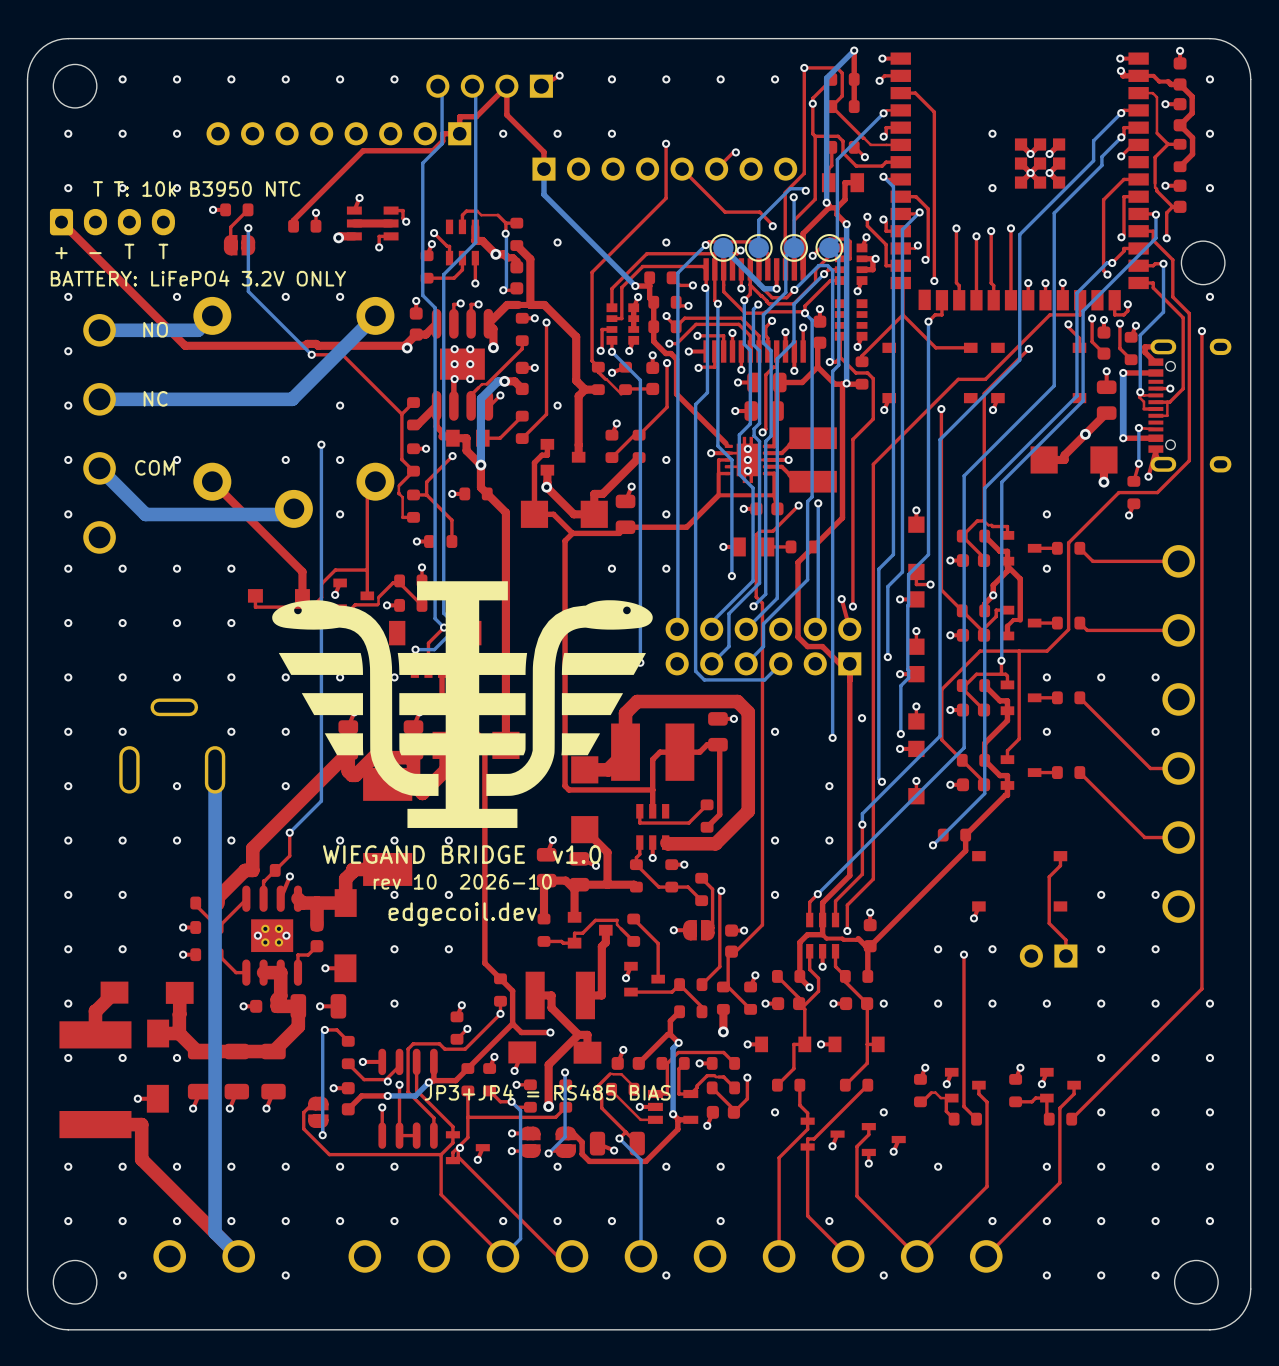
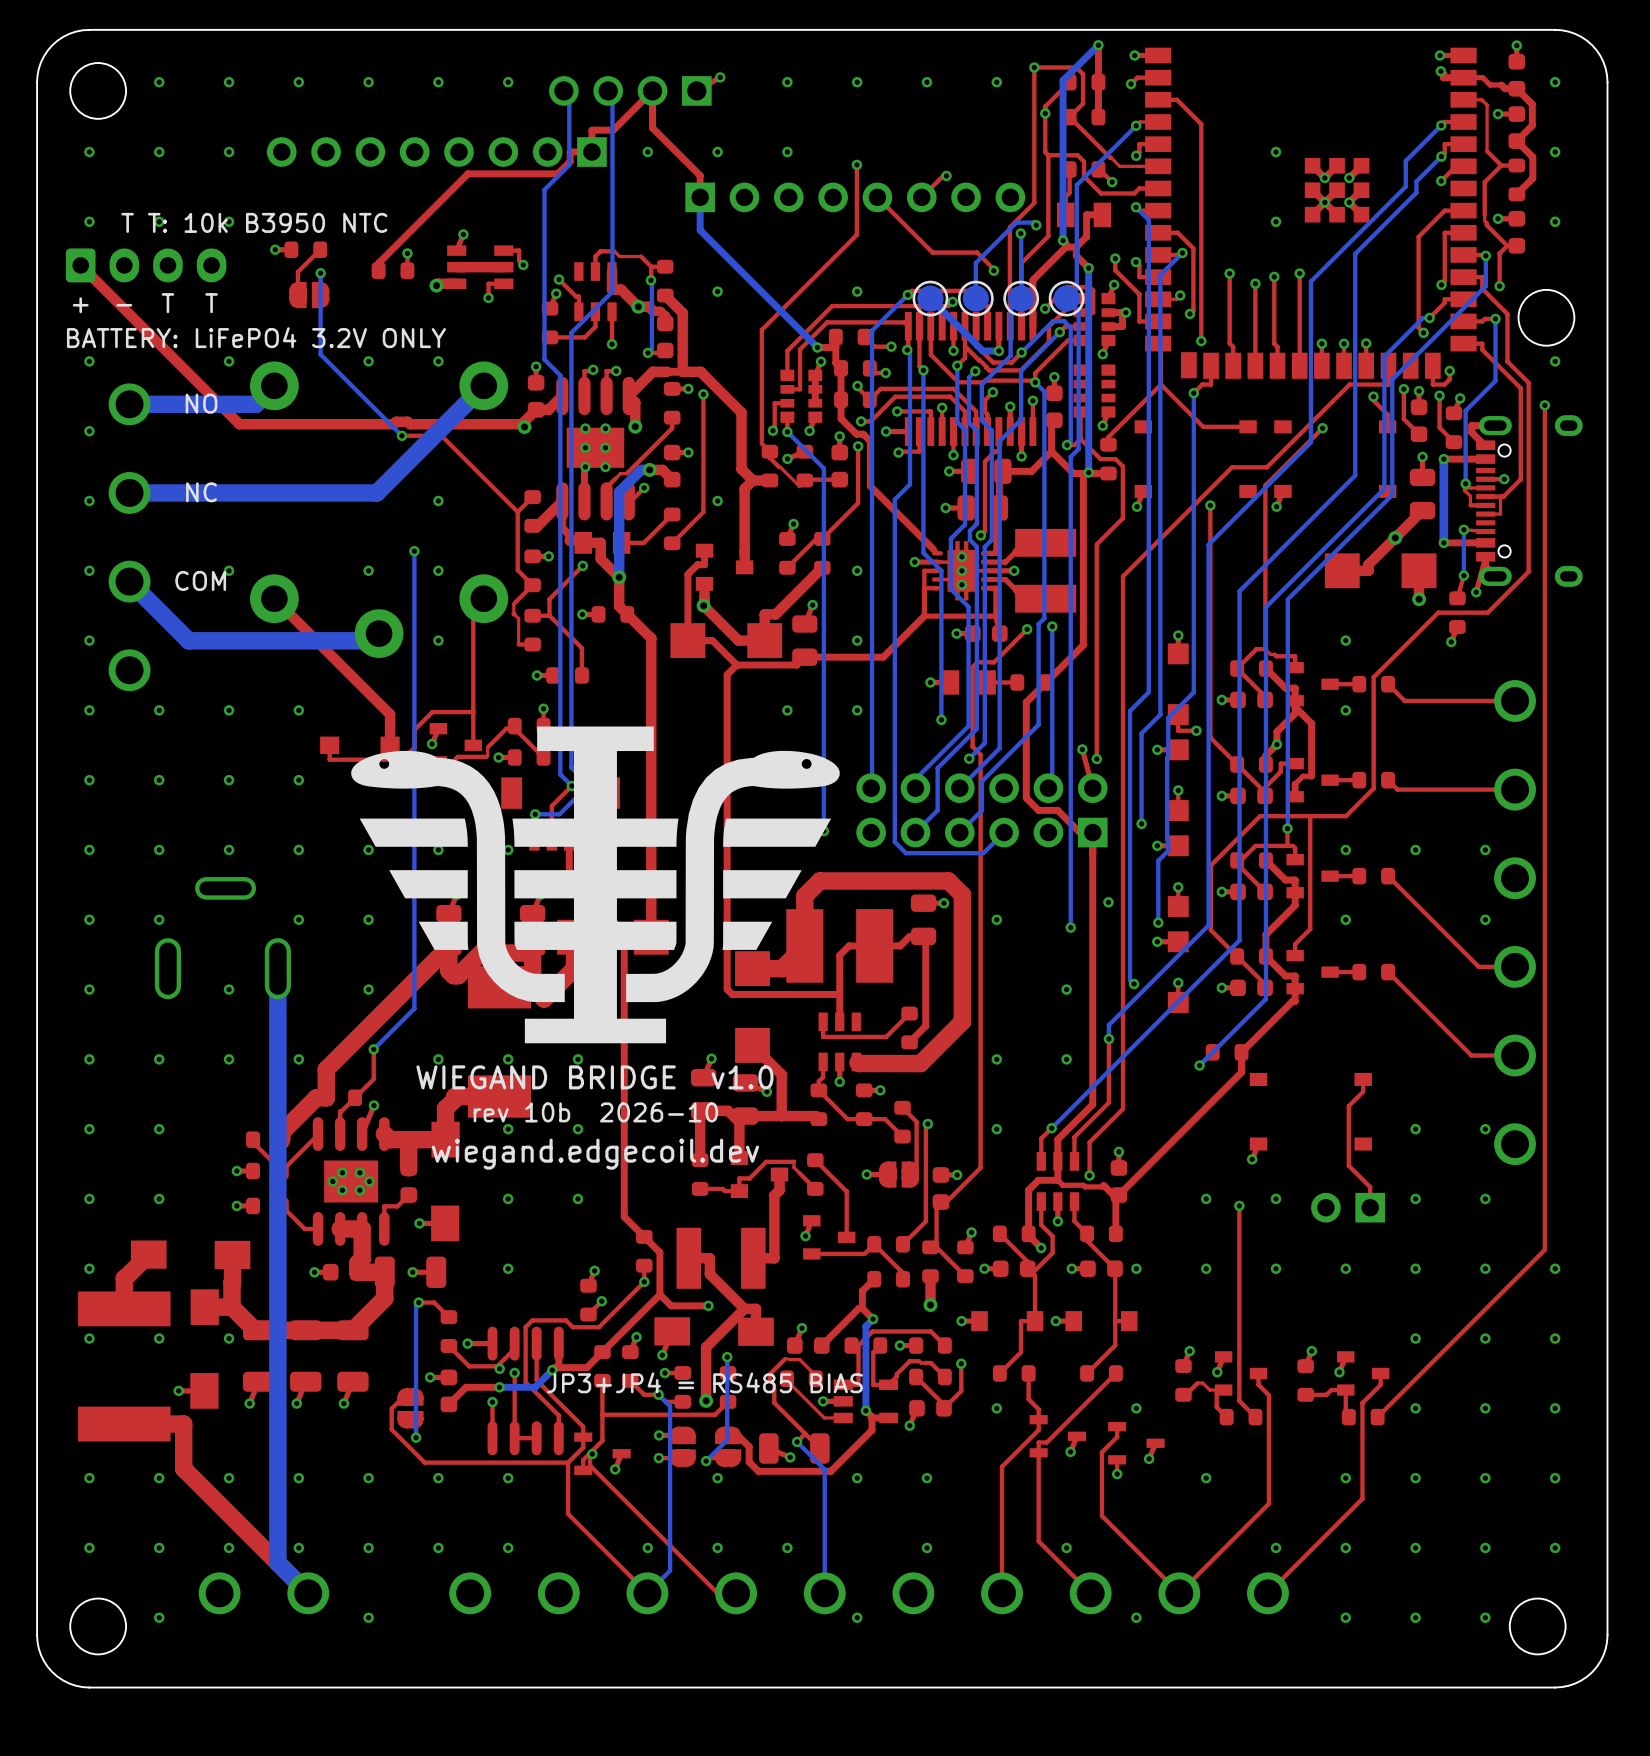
text: rev 10 2026-10 (462, 881) -> rev 10b 2026-10 (595, 1112)
text: edgecoil.dev (462, 914) -> wiegand.edgecoil.dev (595, 1154)

